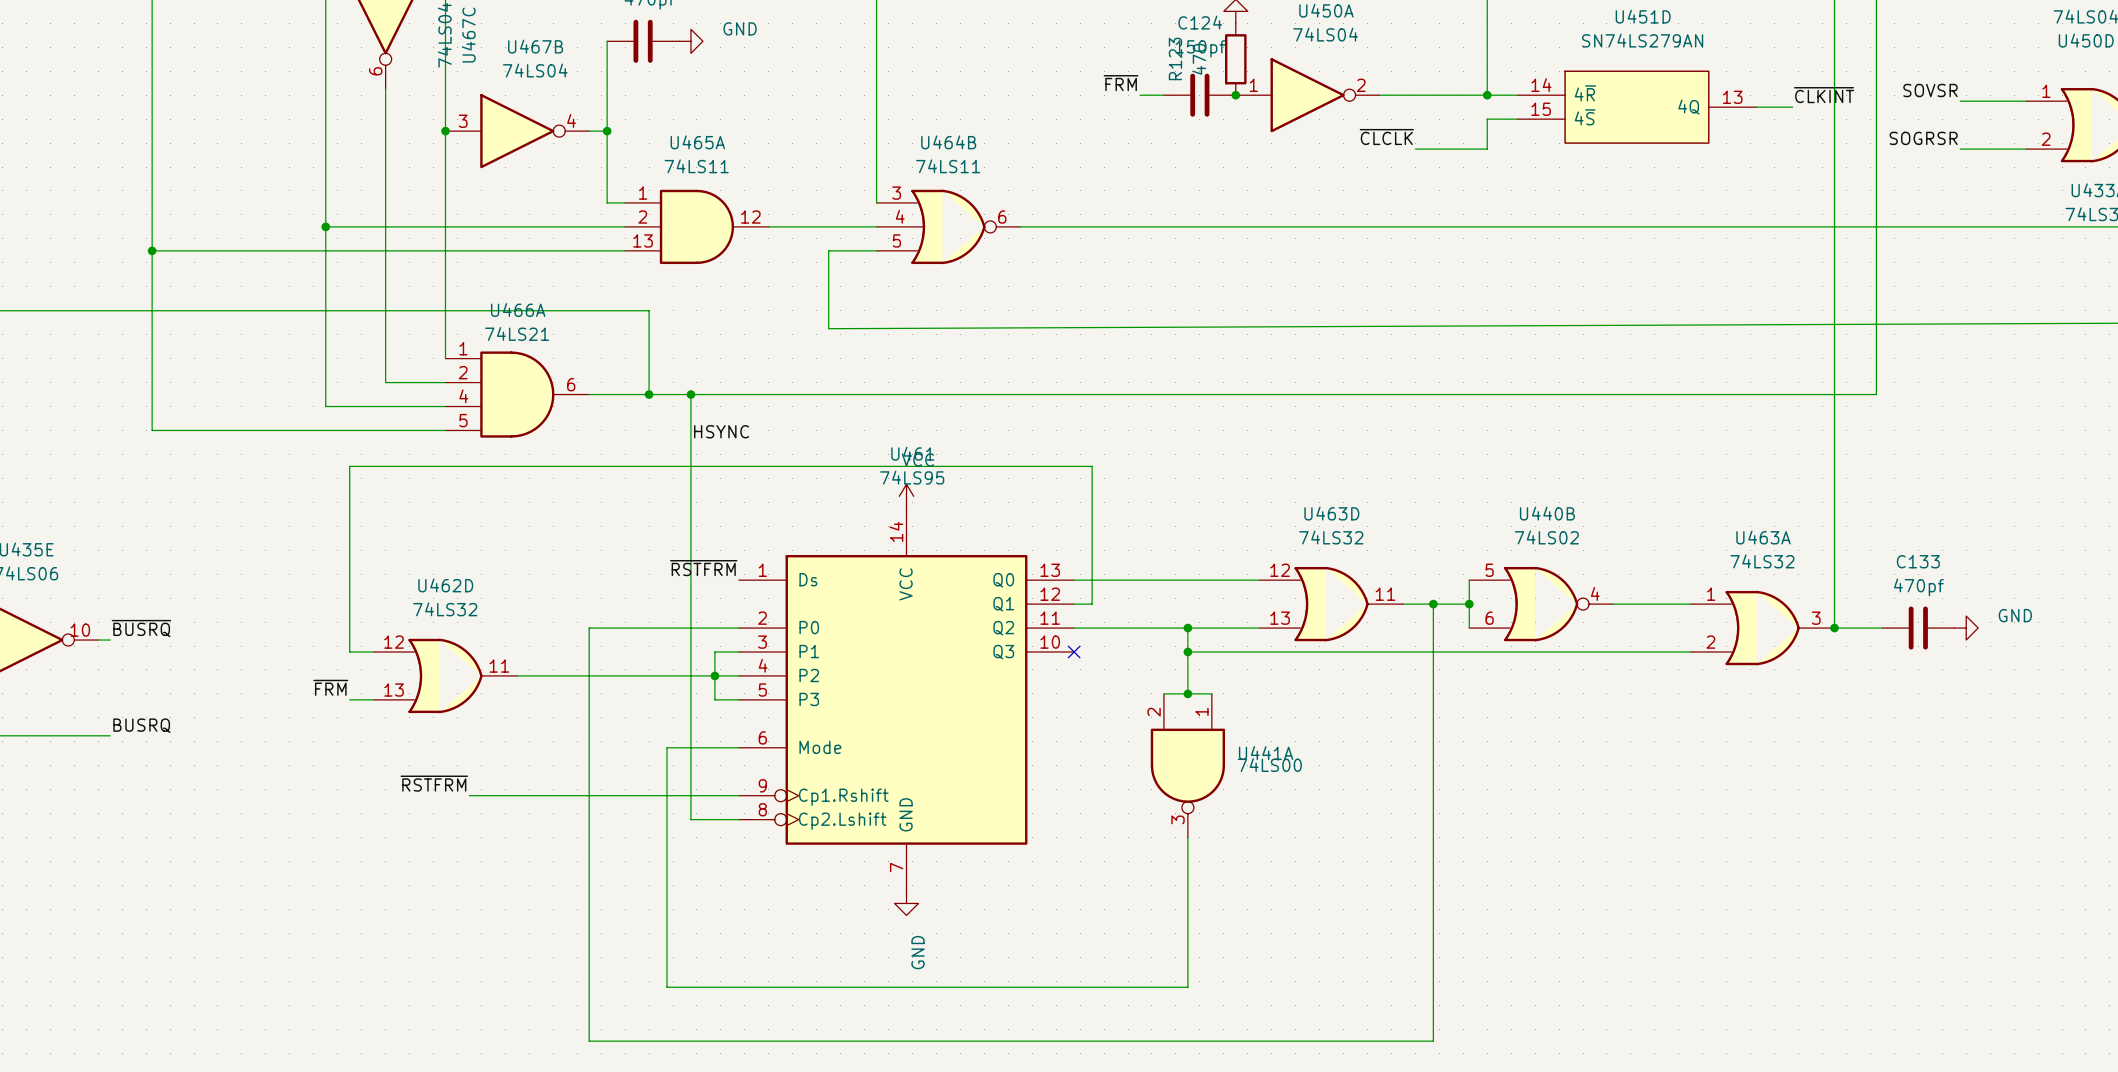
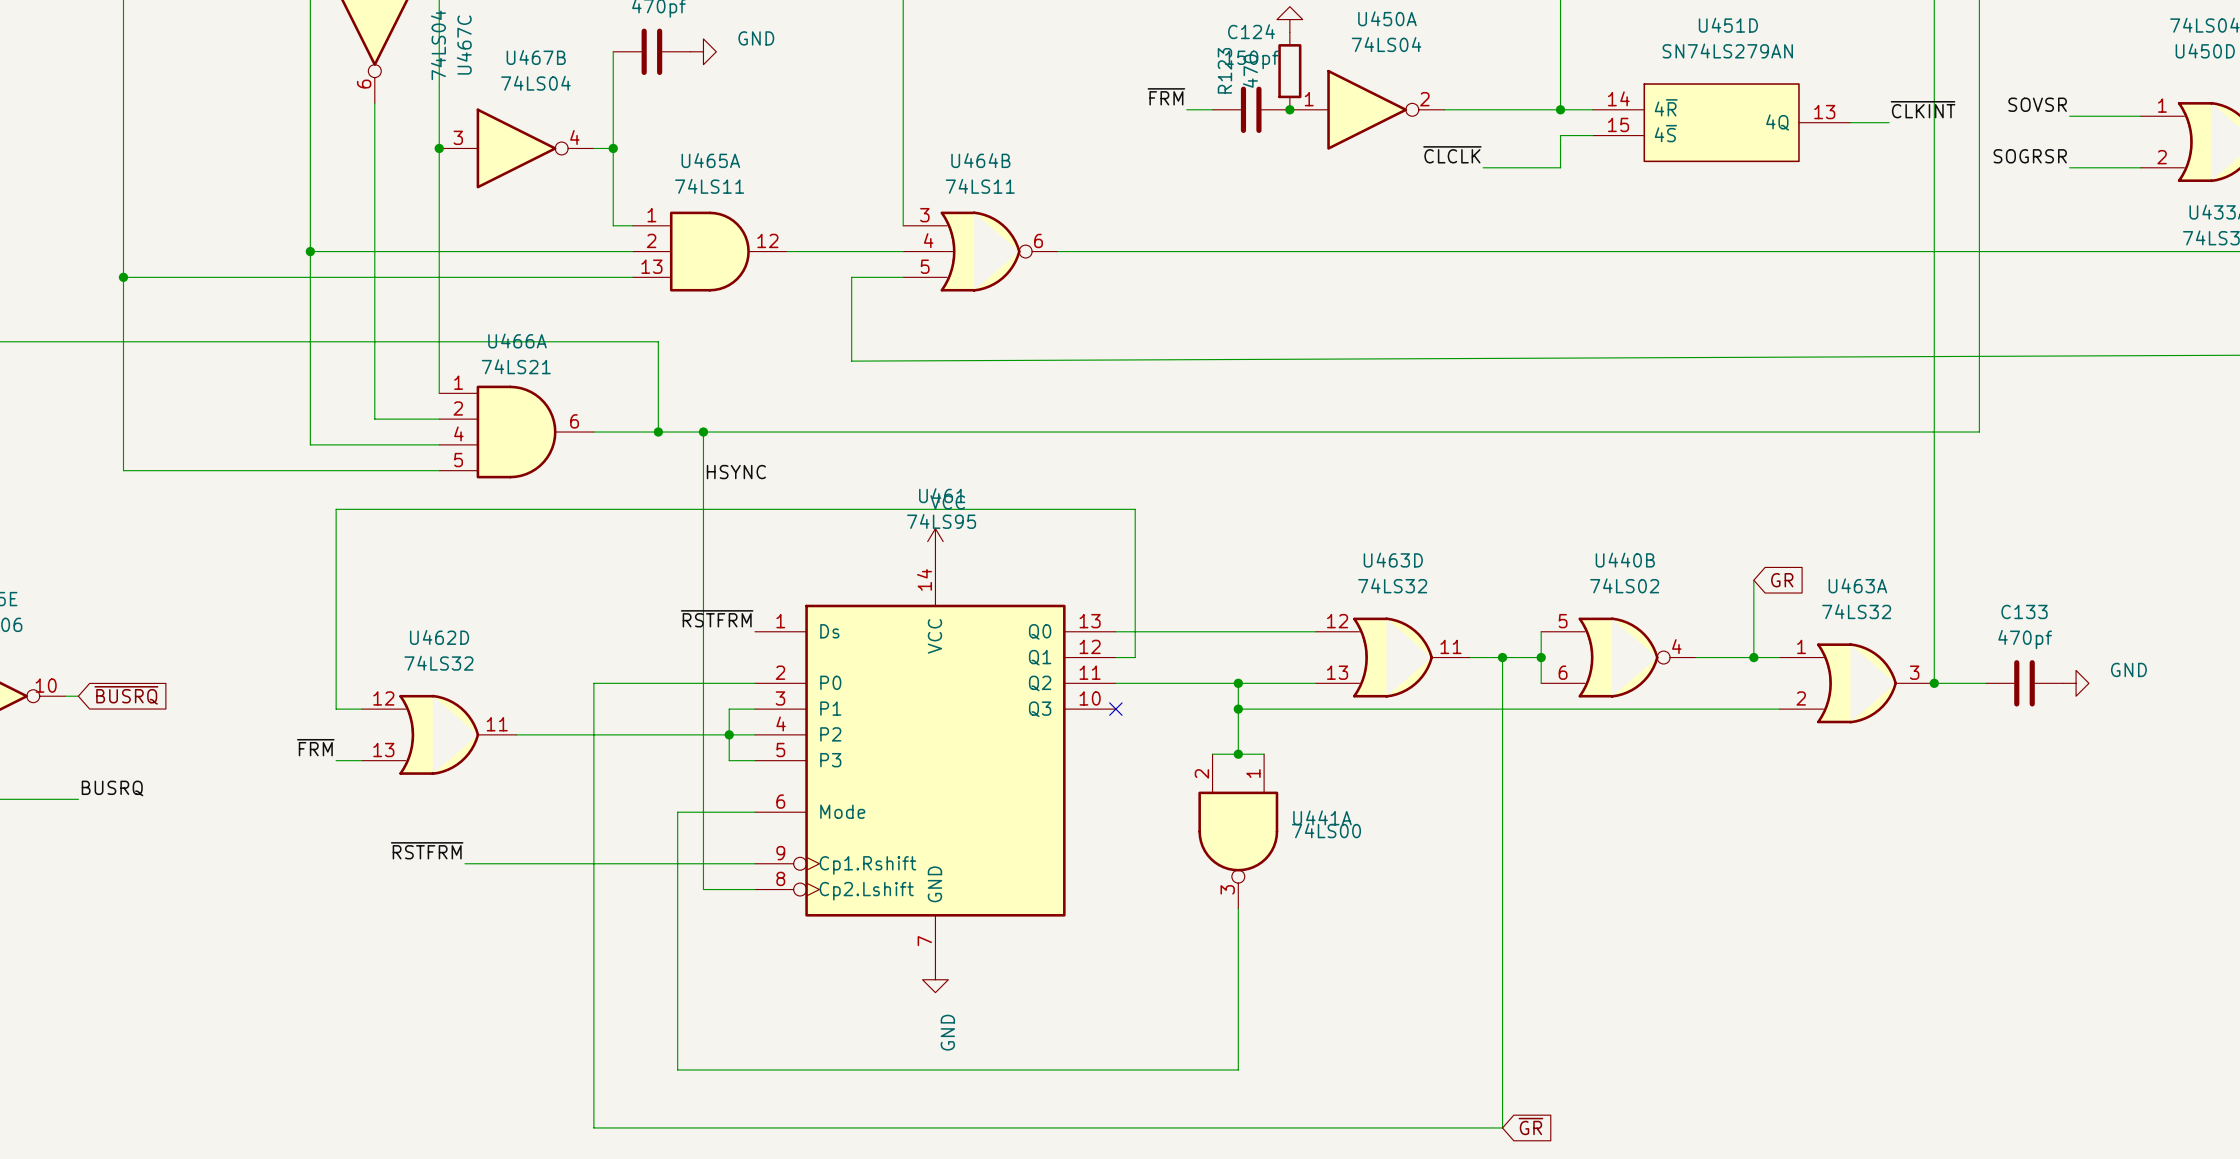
wire: none -> (1753, 580) (1753, 657)
global label: none -> GR (1782, 580)
junction: none -> (1753, 657)
label: ~{BUSRQ} (141, 628) -> none
global label: none -> ~{BUSRQ} (126, 695)
global label: none -> ~{GR} (1530, 1126)

